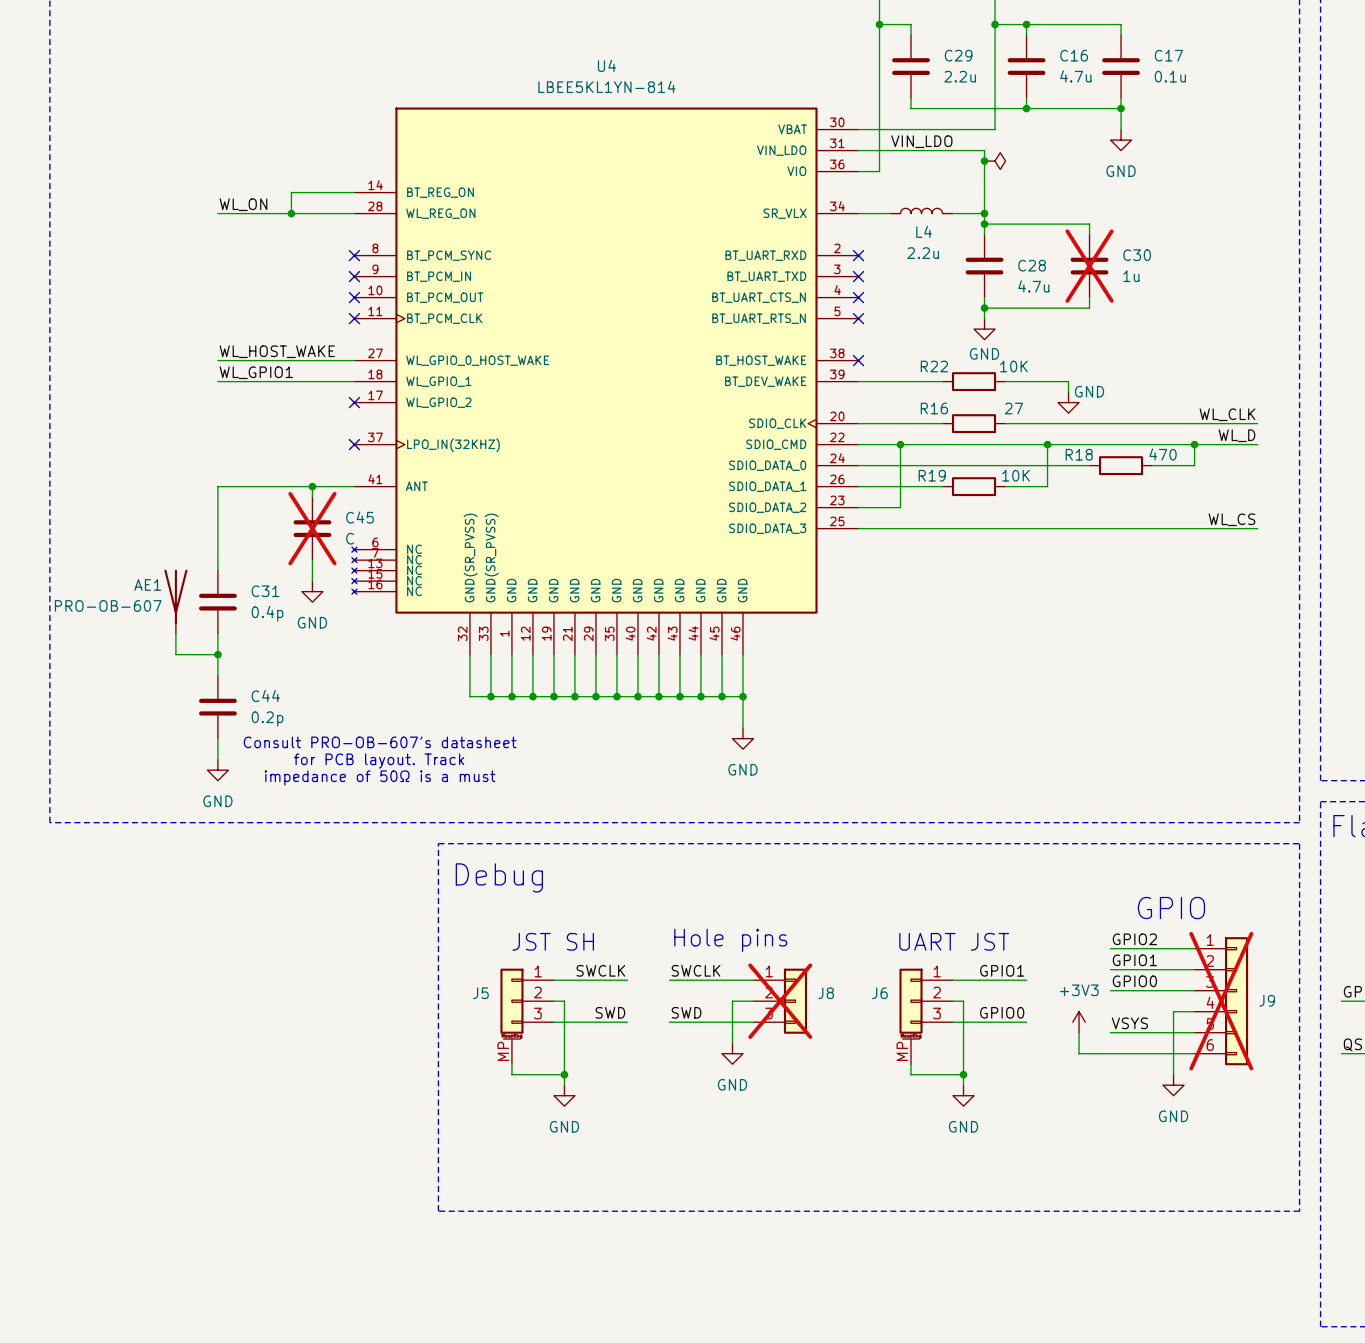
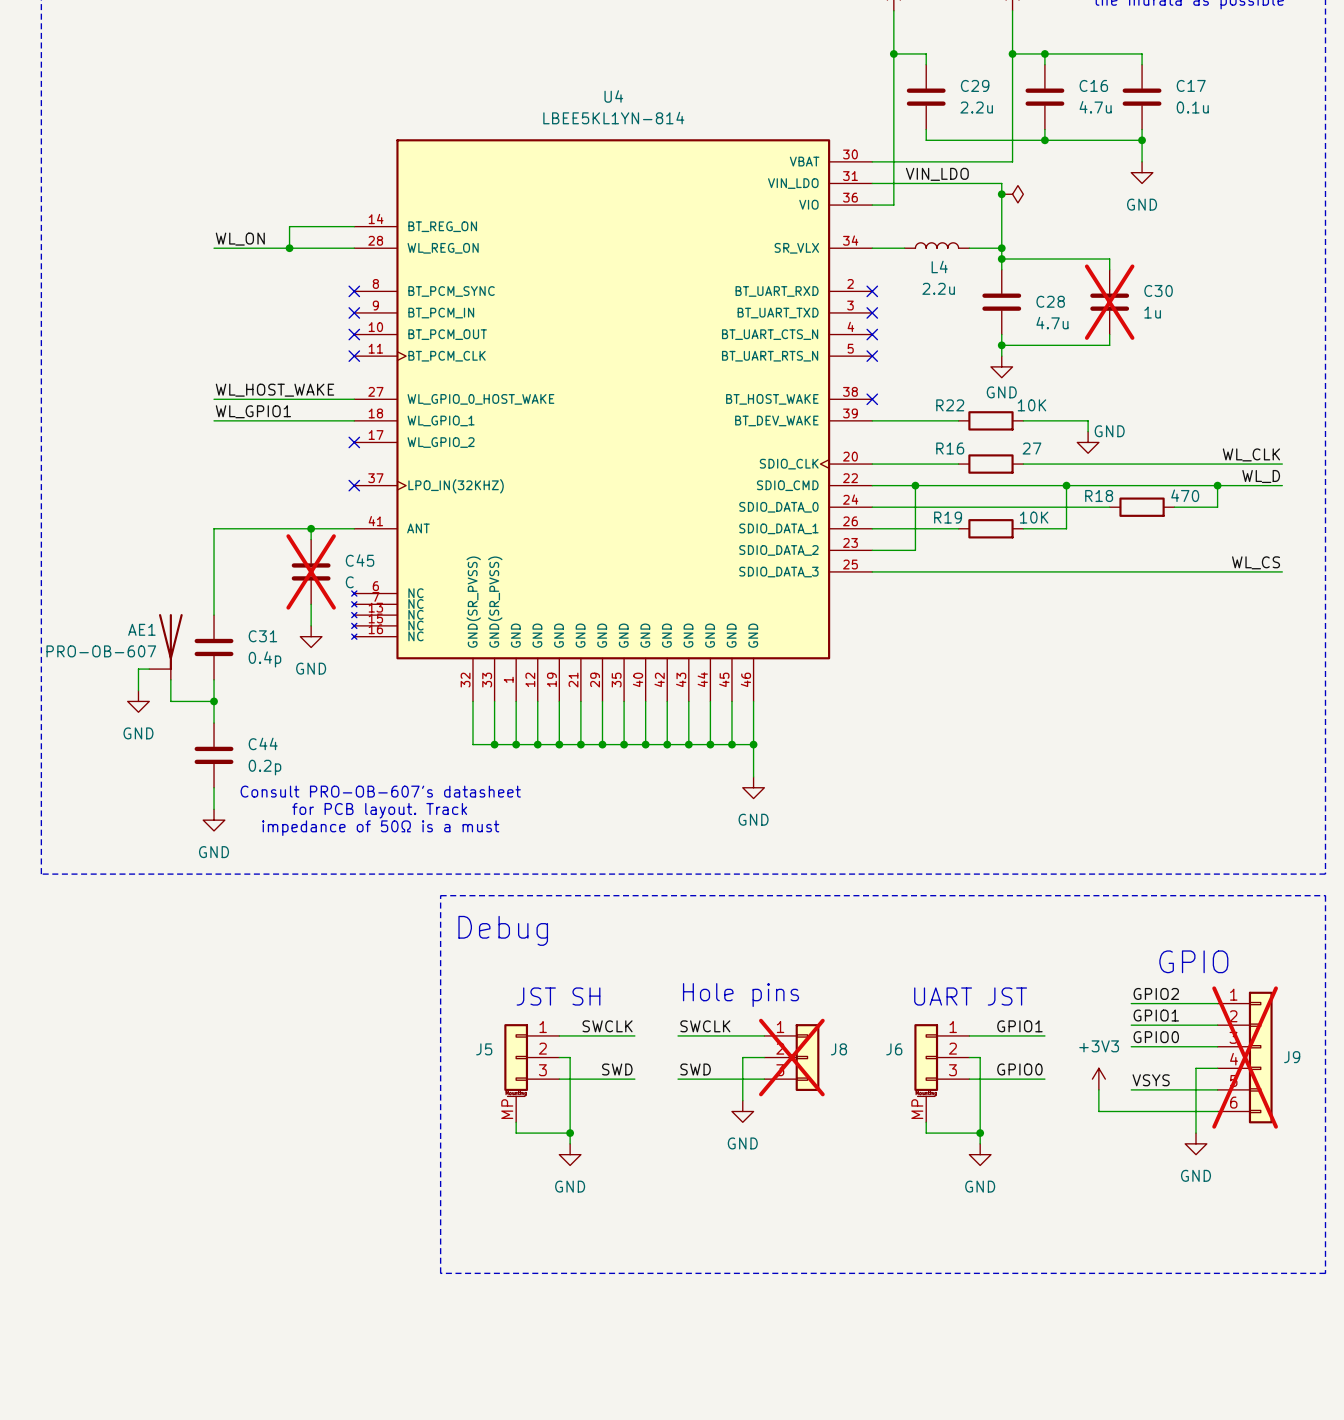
AE1 symbol: [164, 569, 188, 634] -> [149, 614, 183, 680]
wire: none -> (149, 669) (138, 669) (138, 690)
power symbol: none -> GND (138, 701)

